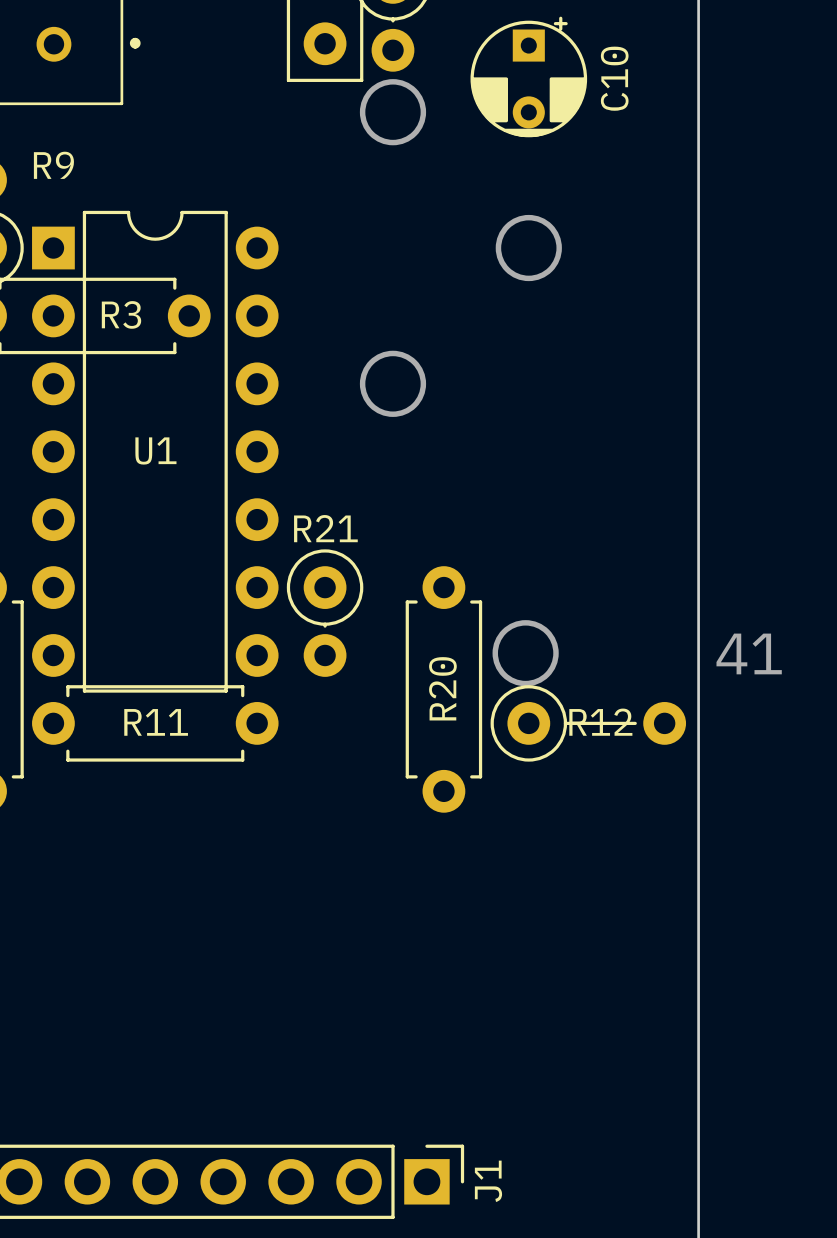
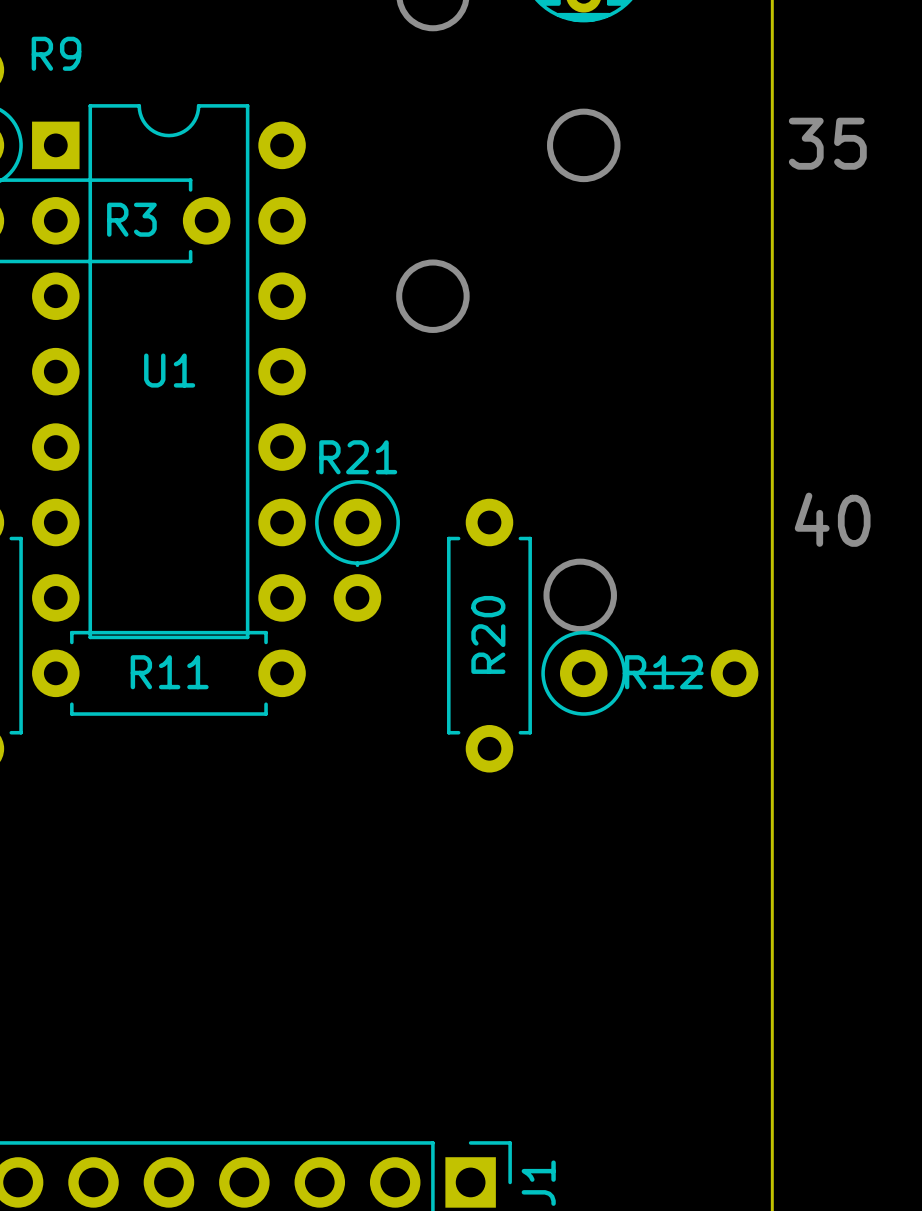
text: none -> 35 (827, 143)
text: none -> 40 (832, 519)
text: 41 (749, 653) -> none

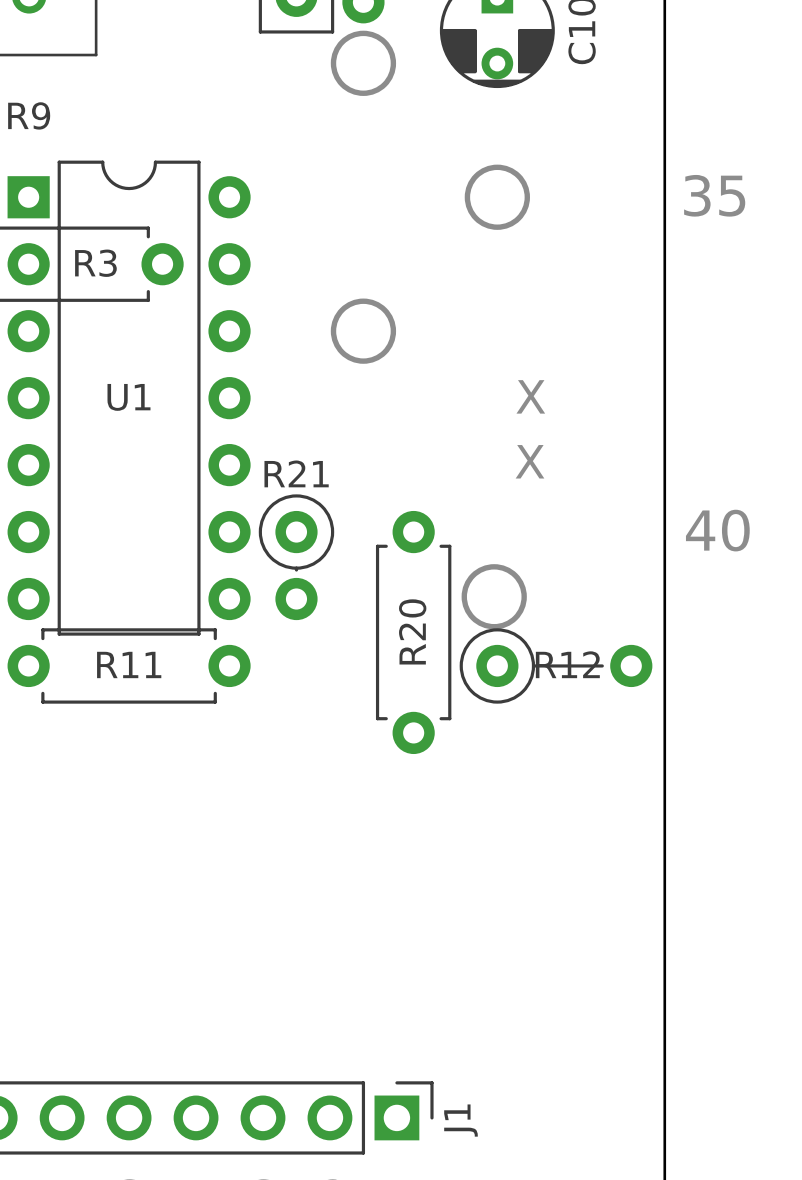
text: none -> X (530, 396)
text: none -> X (530, 461)

